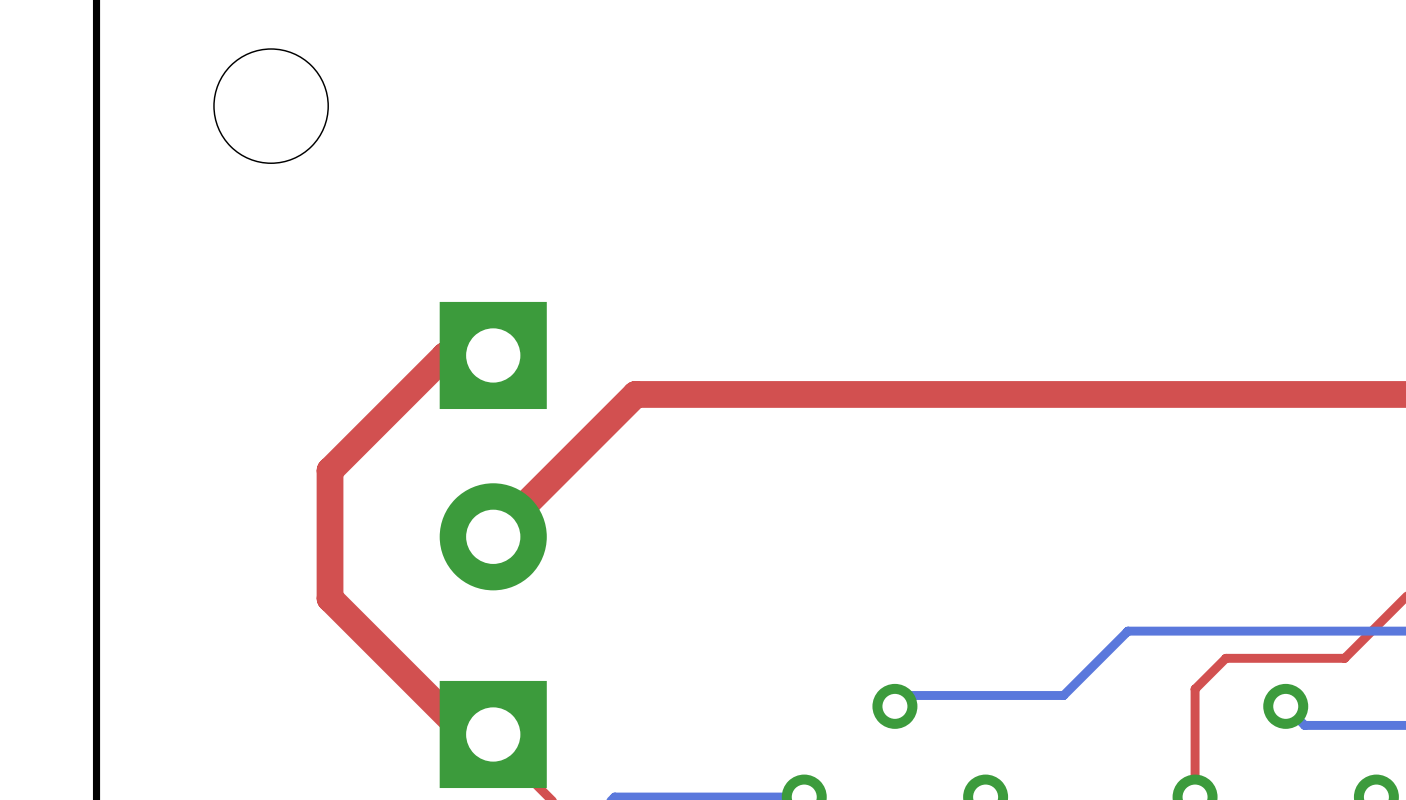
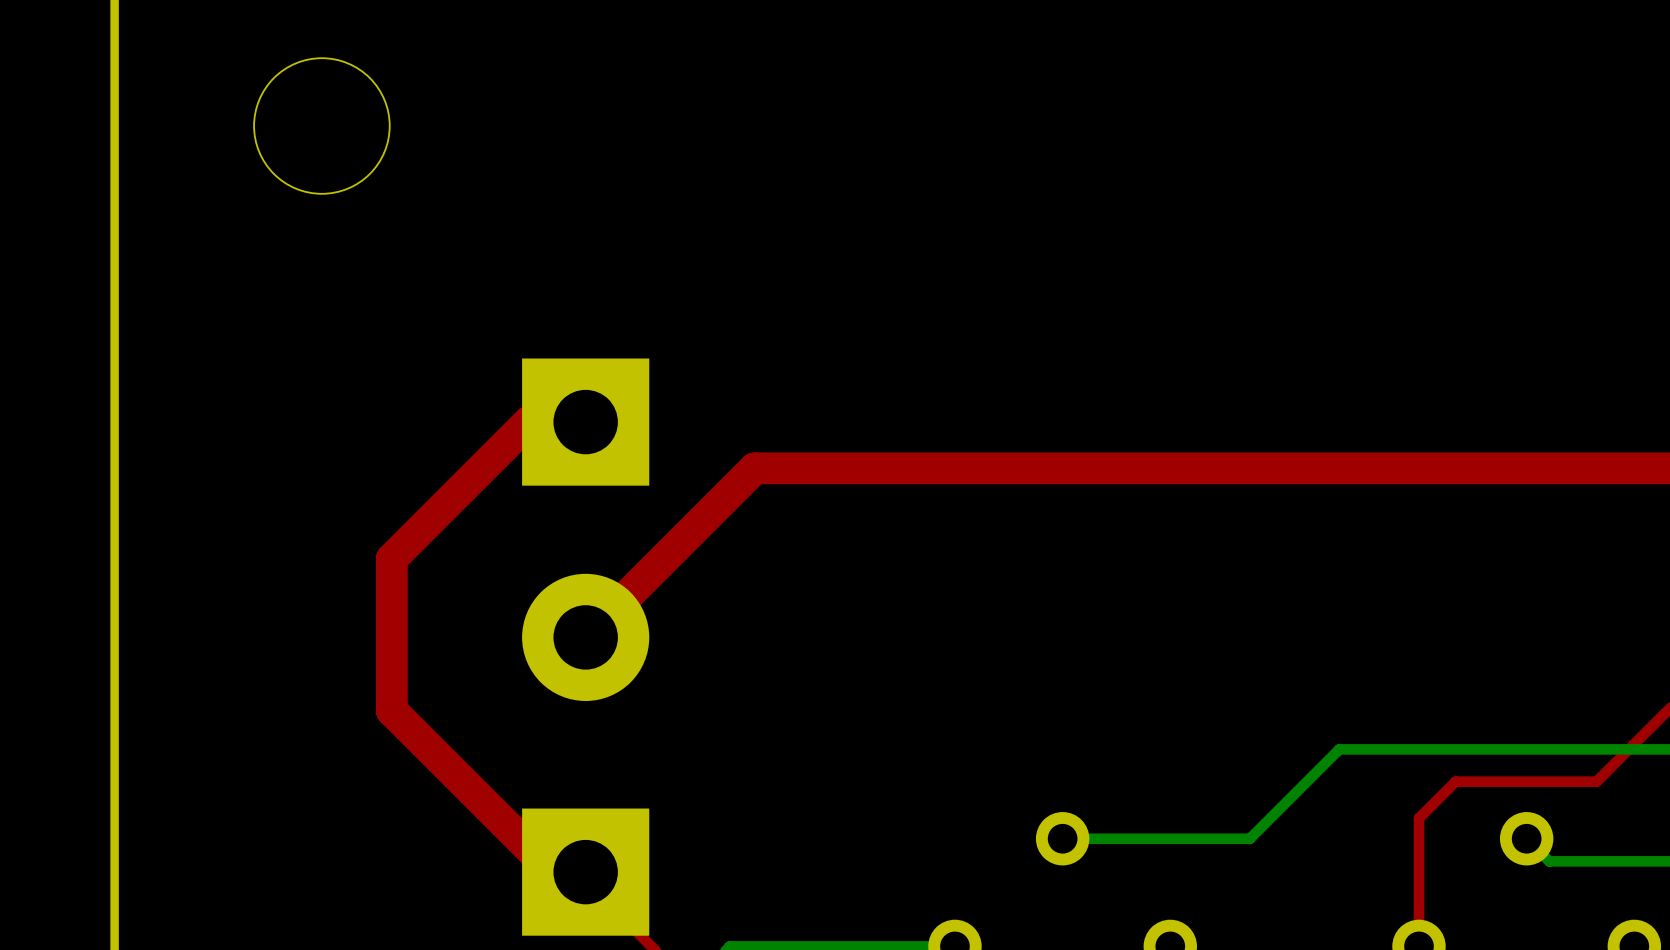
bottom track: (1063, 695) (905, 695) -> (1262, 825) (1249, 838) (1062, 838)

